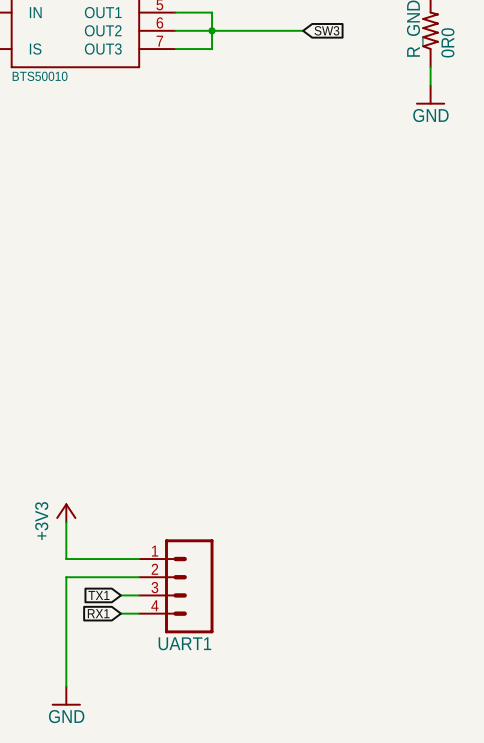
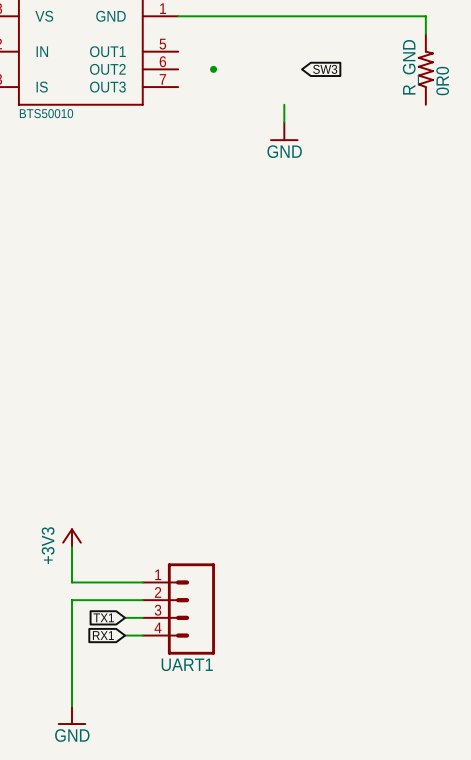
wire: (175, 12) (212, 12) (212, 49) (175, 49) -> none
wire: (175, 30) (303, 30) -> none
wire: (430, 67) (430, 85) -> (284, 104) (284, 122)
power symbol position: GND (430, 95) -> GND (284, 131)

